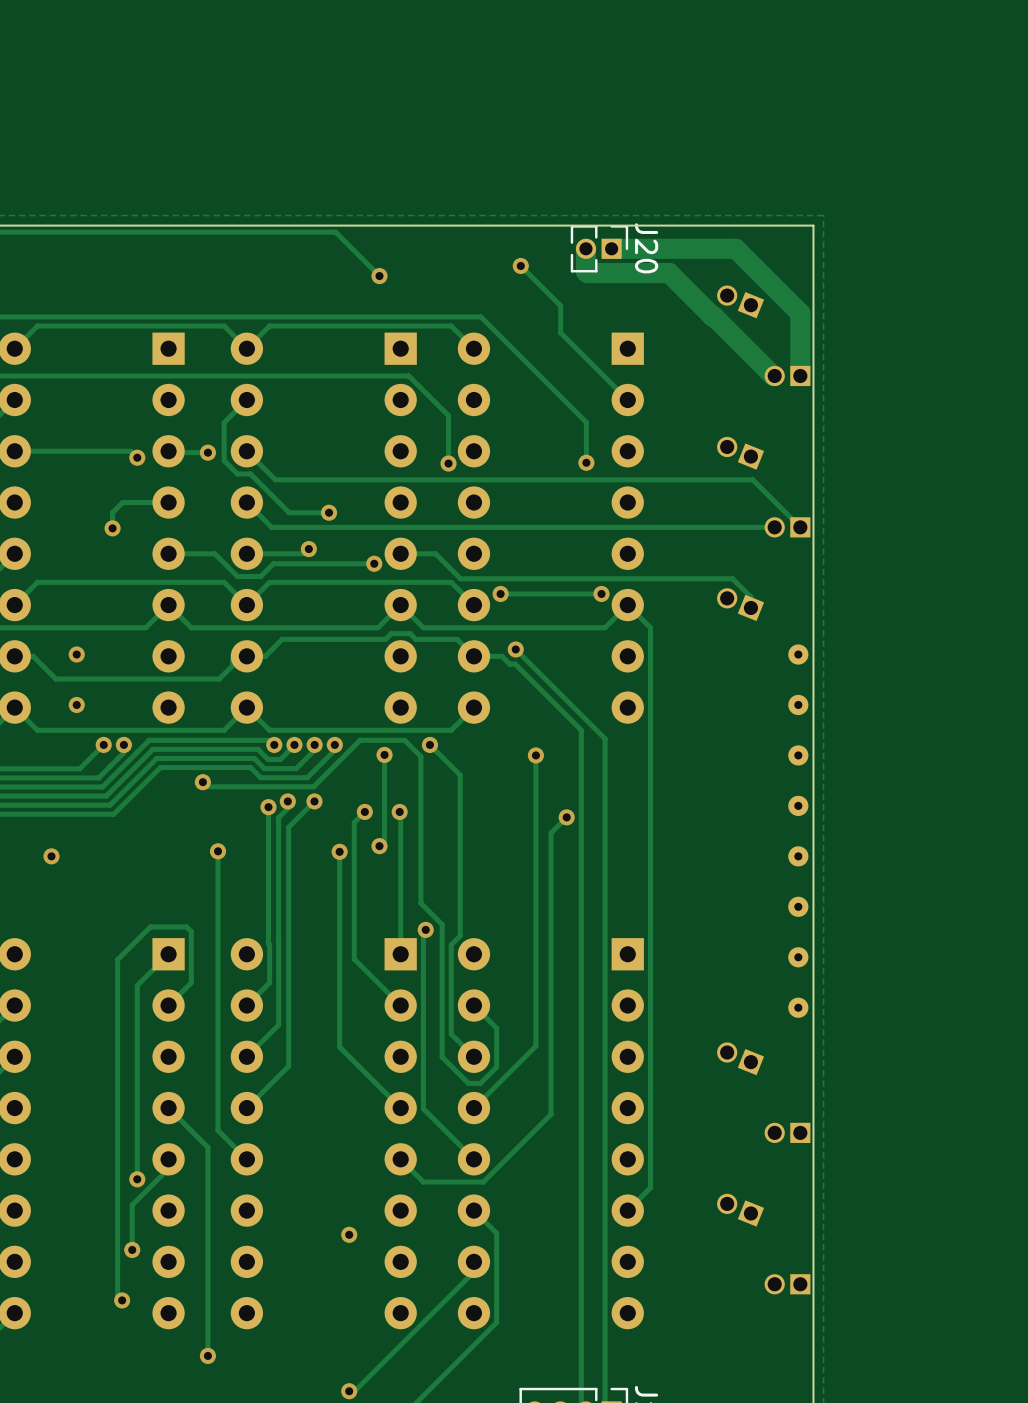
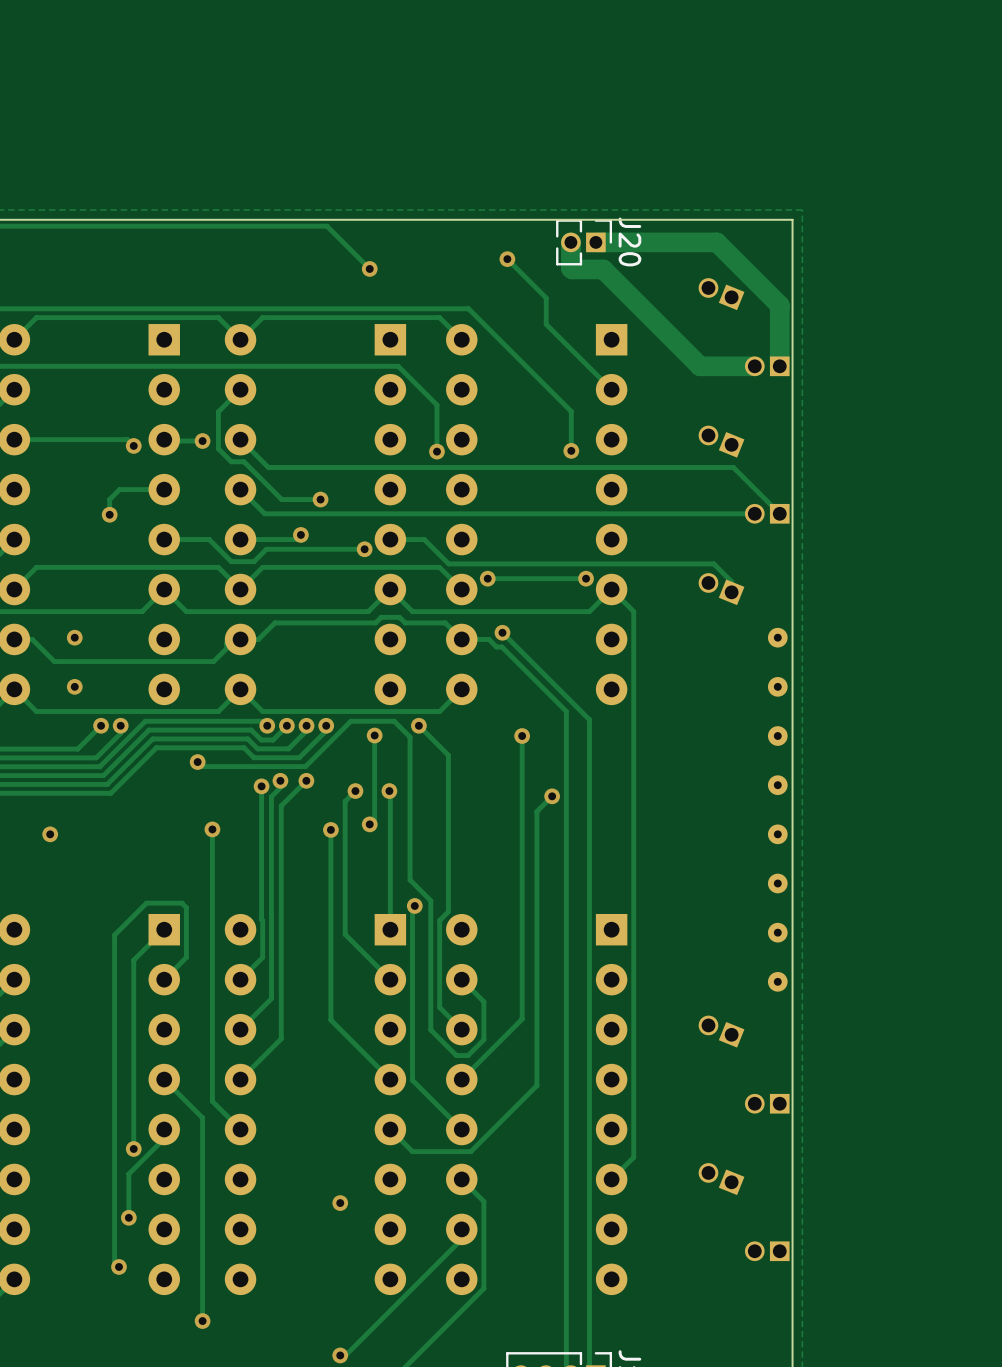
track: (585, 271) (669, 273) (773, 375) -> (570, 264) (572, 269) (603, 269) (700, 366) (753, 366)

